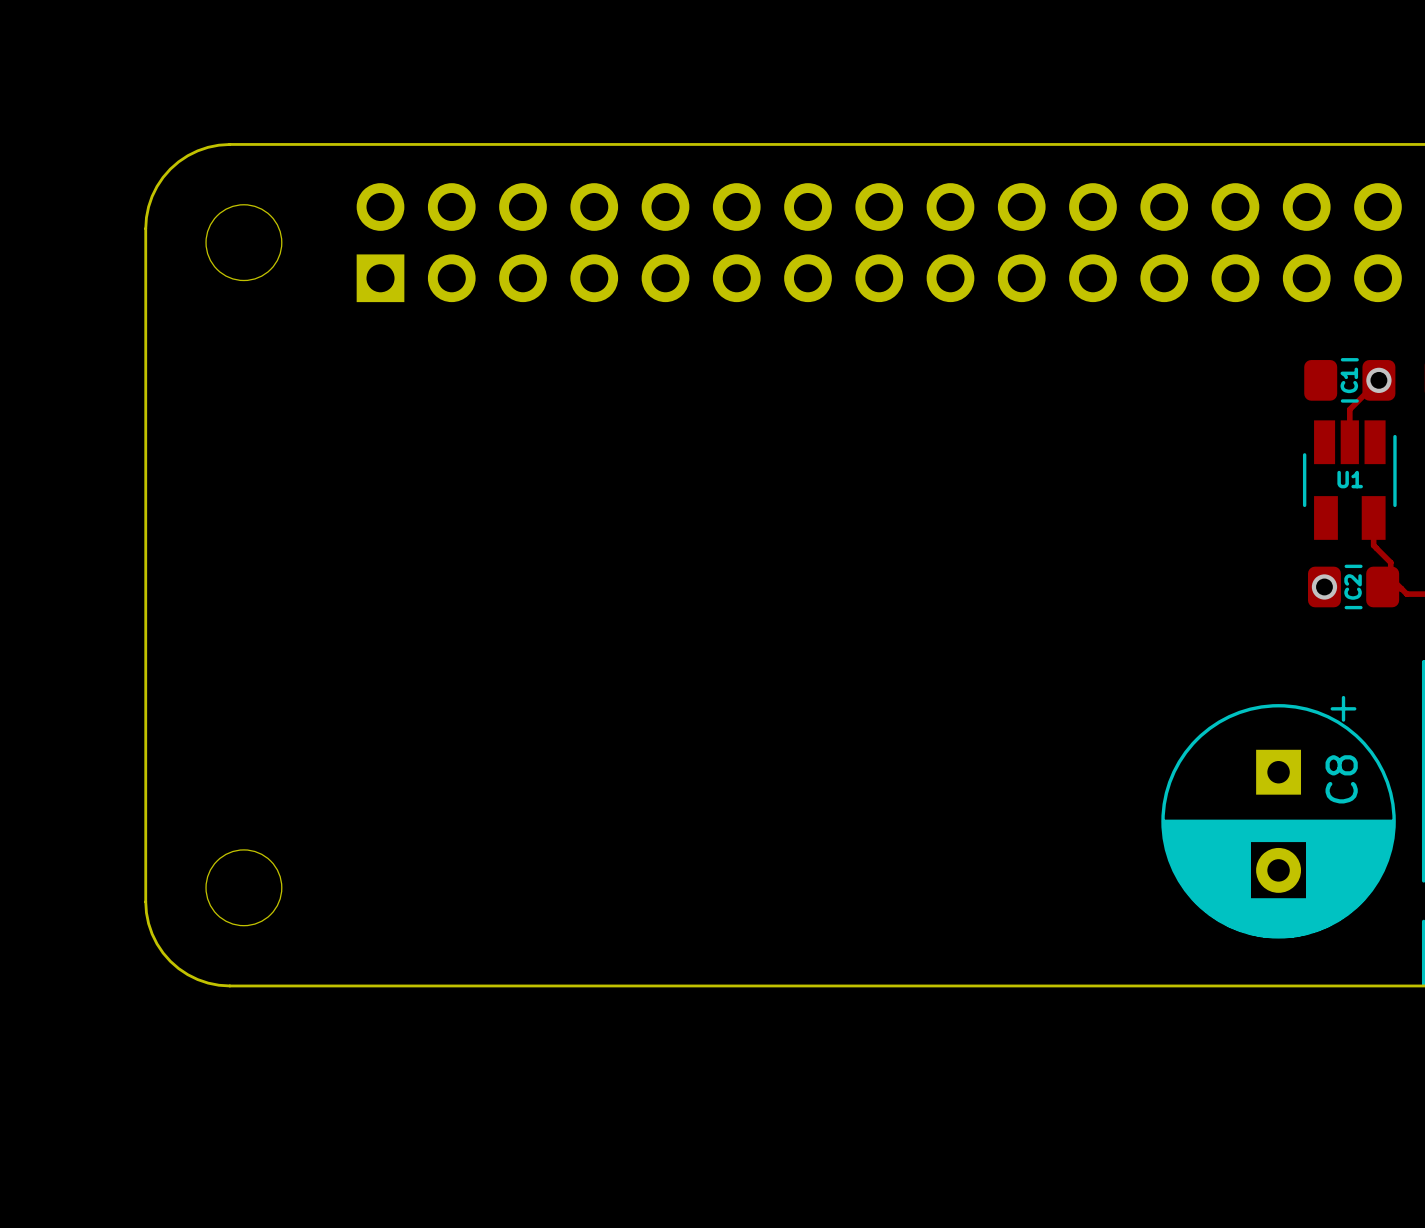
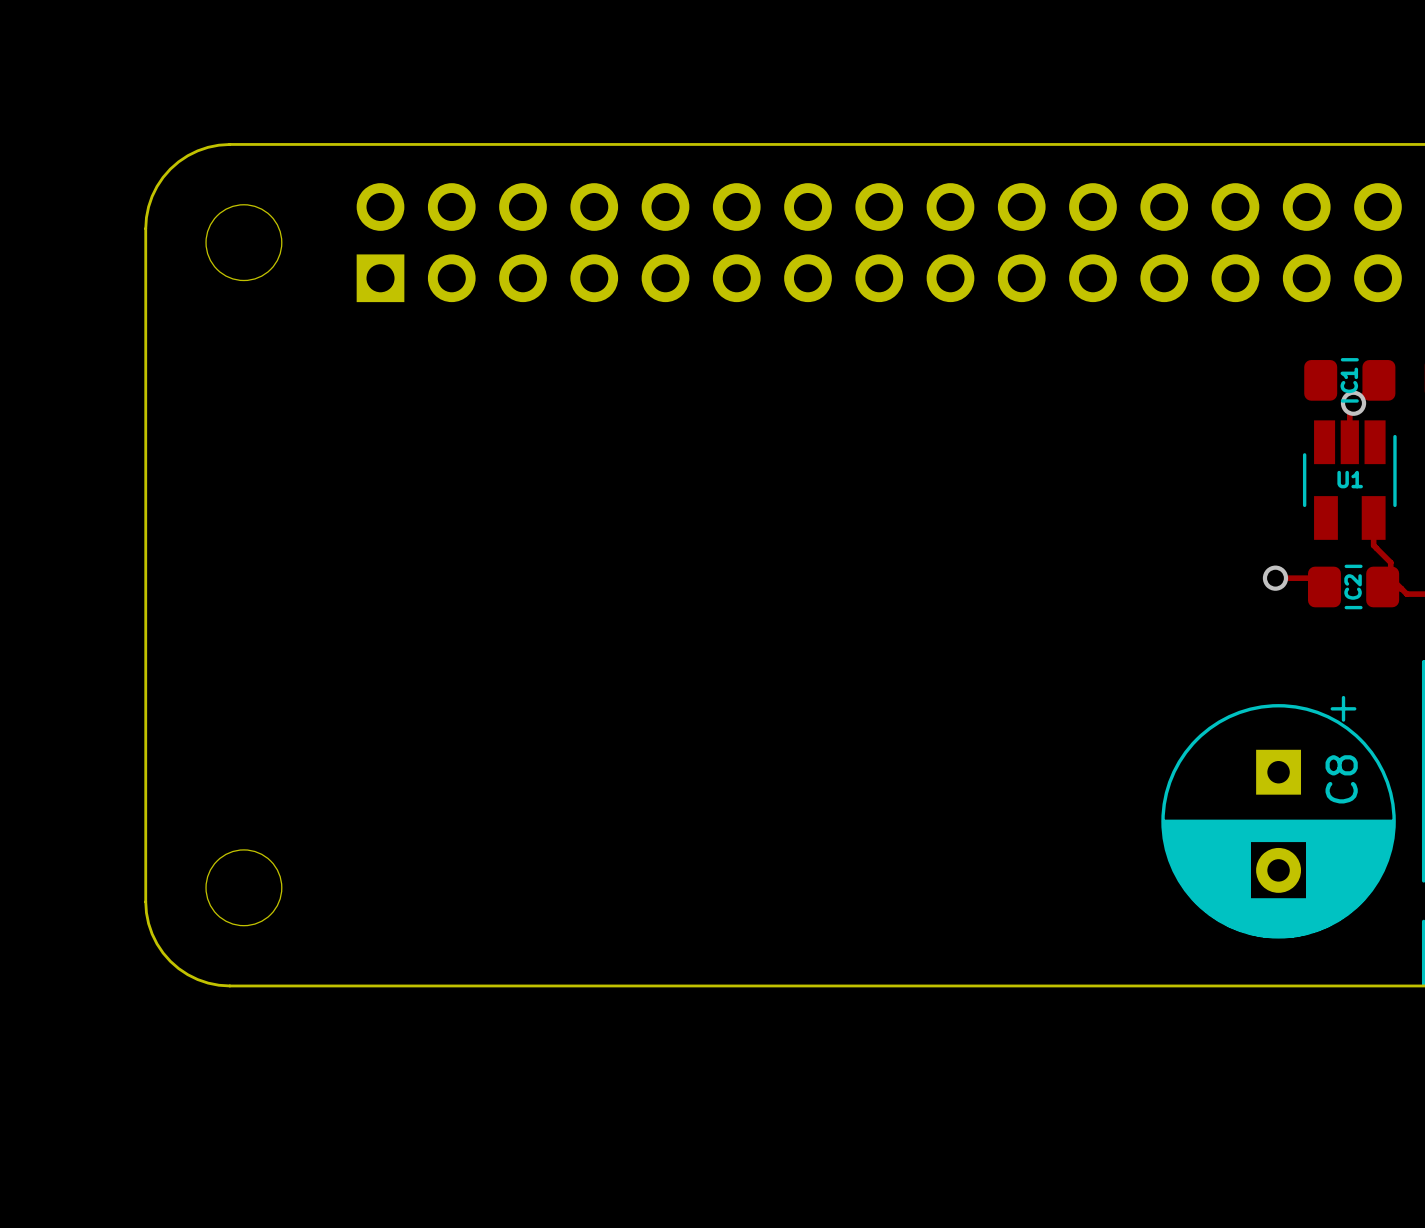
via position: (1378, 380) -> (1353, 403)
track: none -> (1275, 578) (1315, 578)
via position: (1324, 586) -> (1275, 578)

